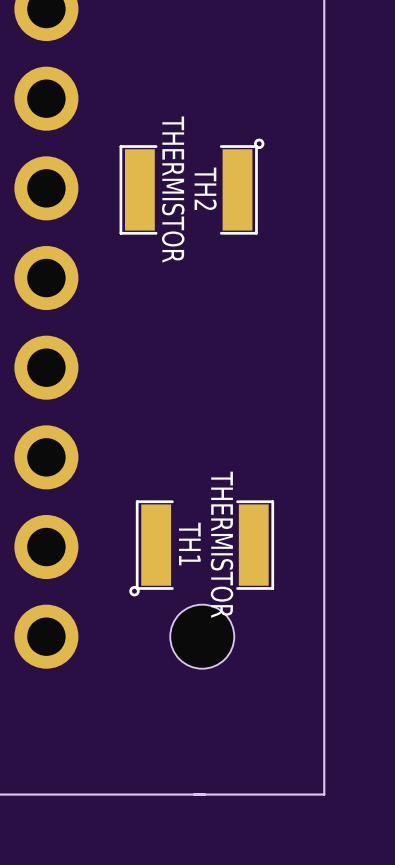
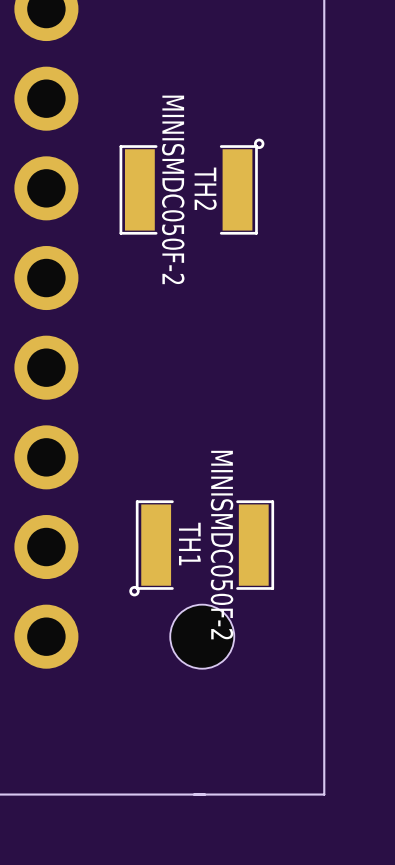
TH2 value: THERMISTOR (173, 189) -> MINISMDC050F-2 (173, 189)
TH1 value: THERMISTOR (222, 544) -> MINISMDC050F-2 (222, 545)

